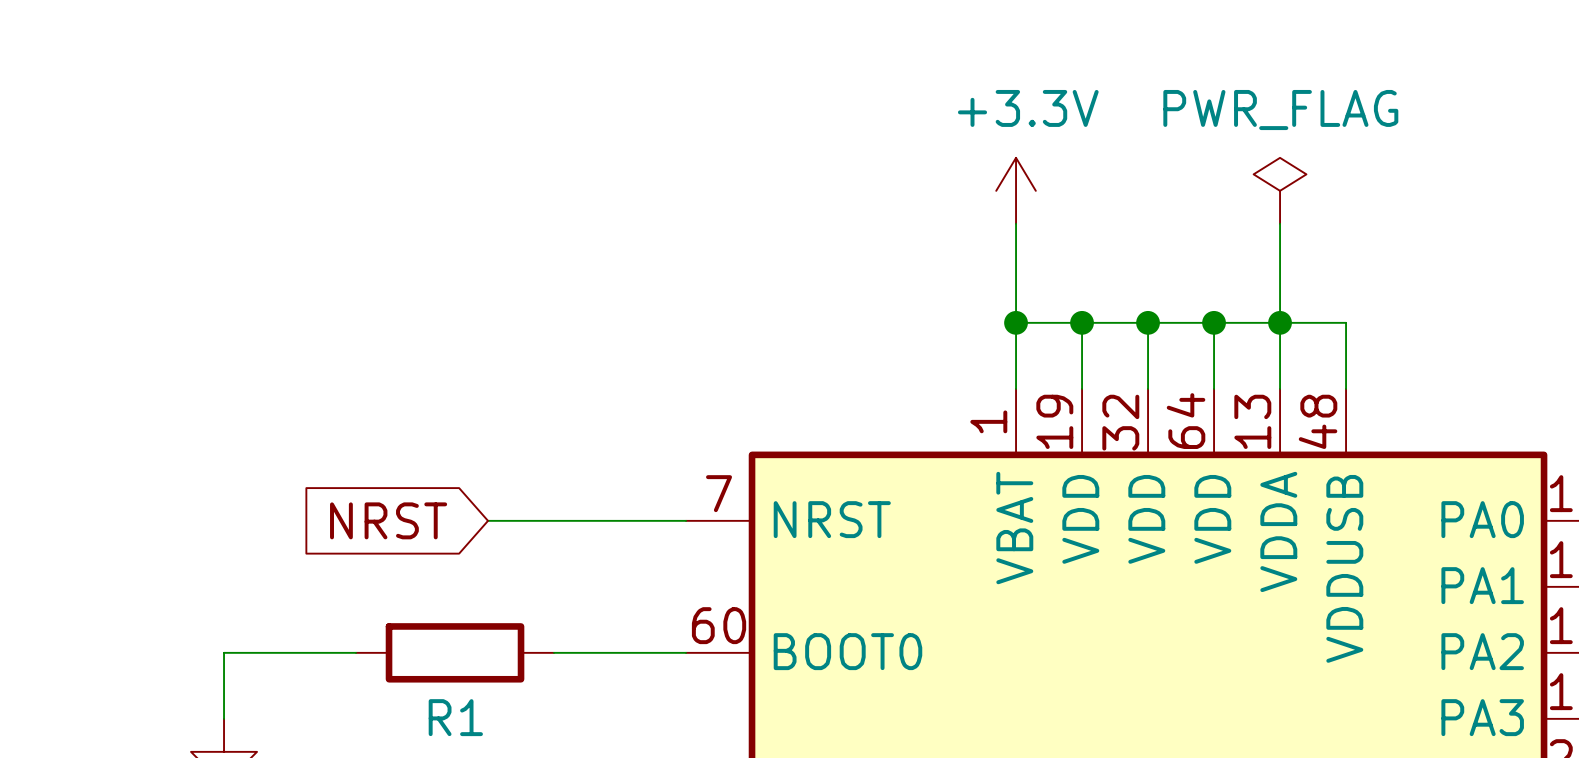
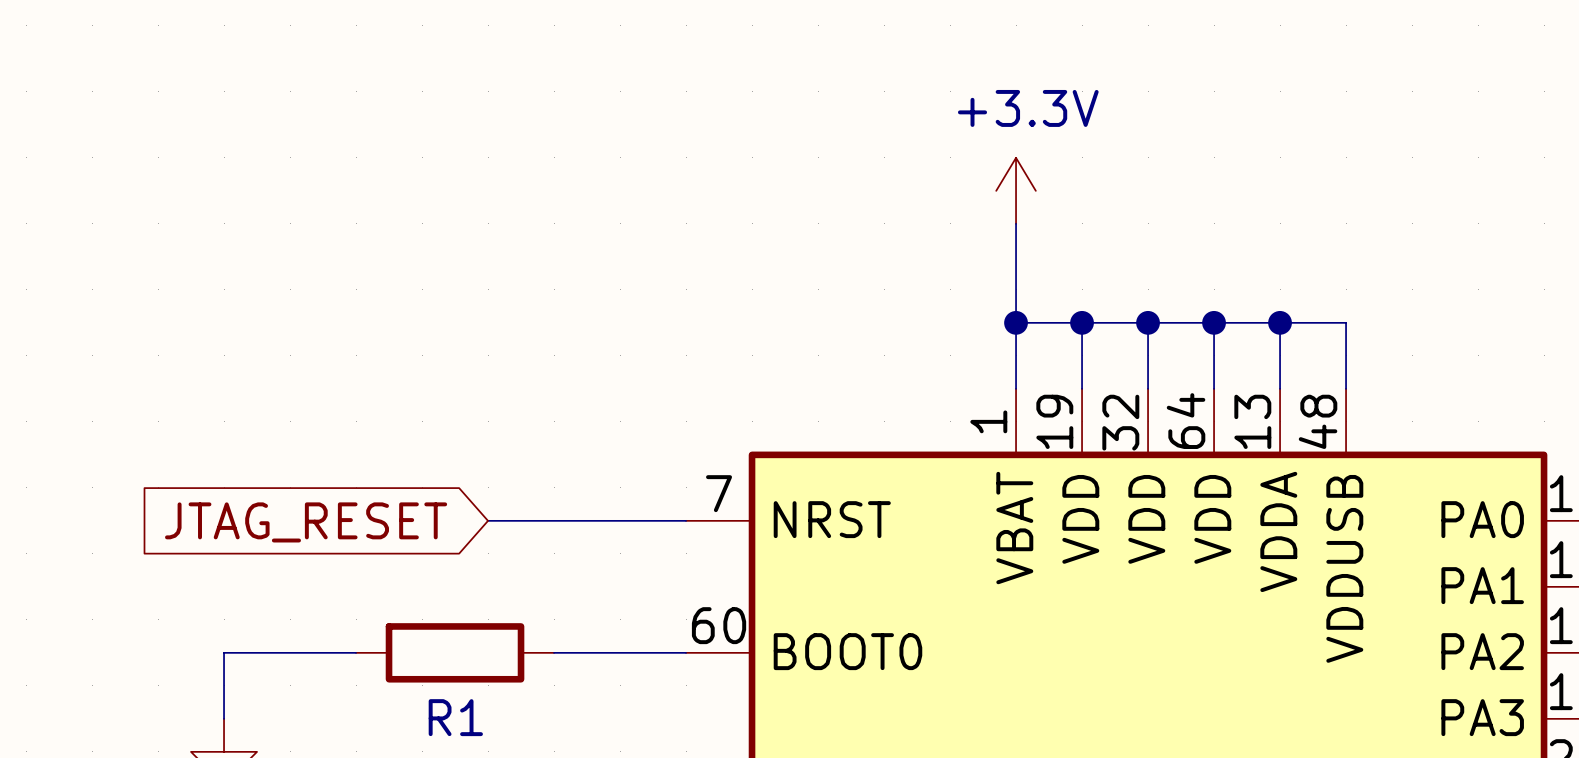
power symbol: PWR_FLAG (1280, 190) -> none
wire: (1280, 223) (1280, 322) -> none
global label: NRST (388, 520) -> JTAG_RESET (306, 522)

